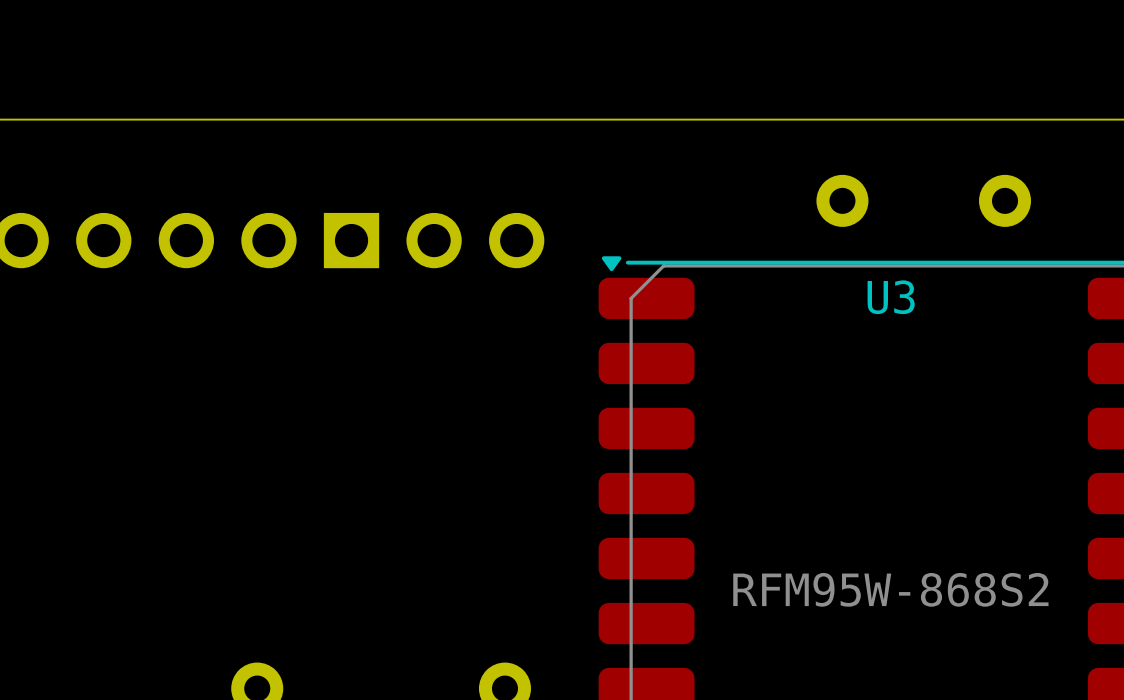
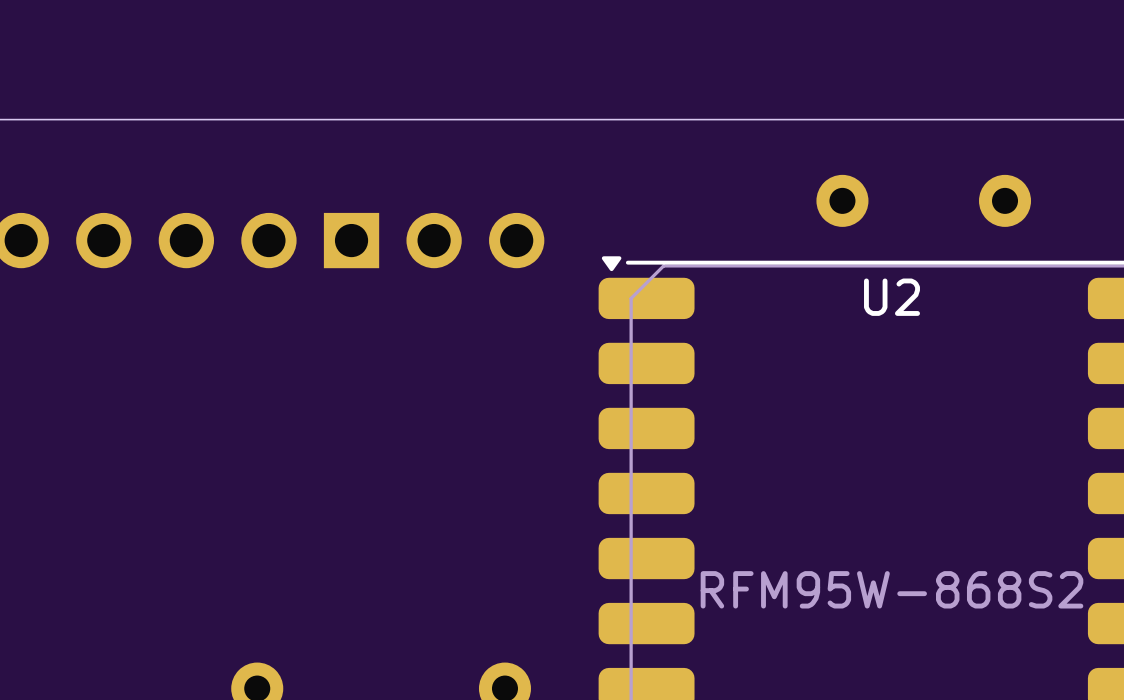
U3 name: U3 (891, 297) -> U2 (891, 297)

